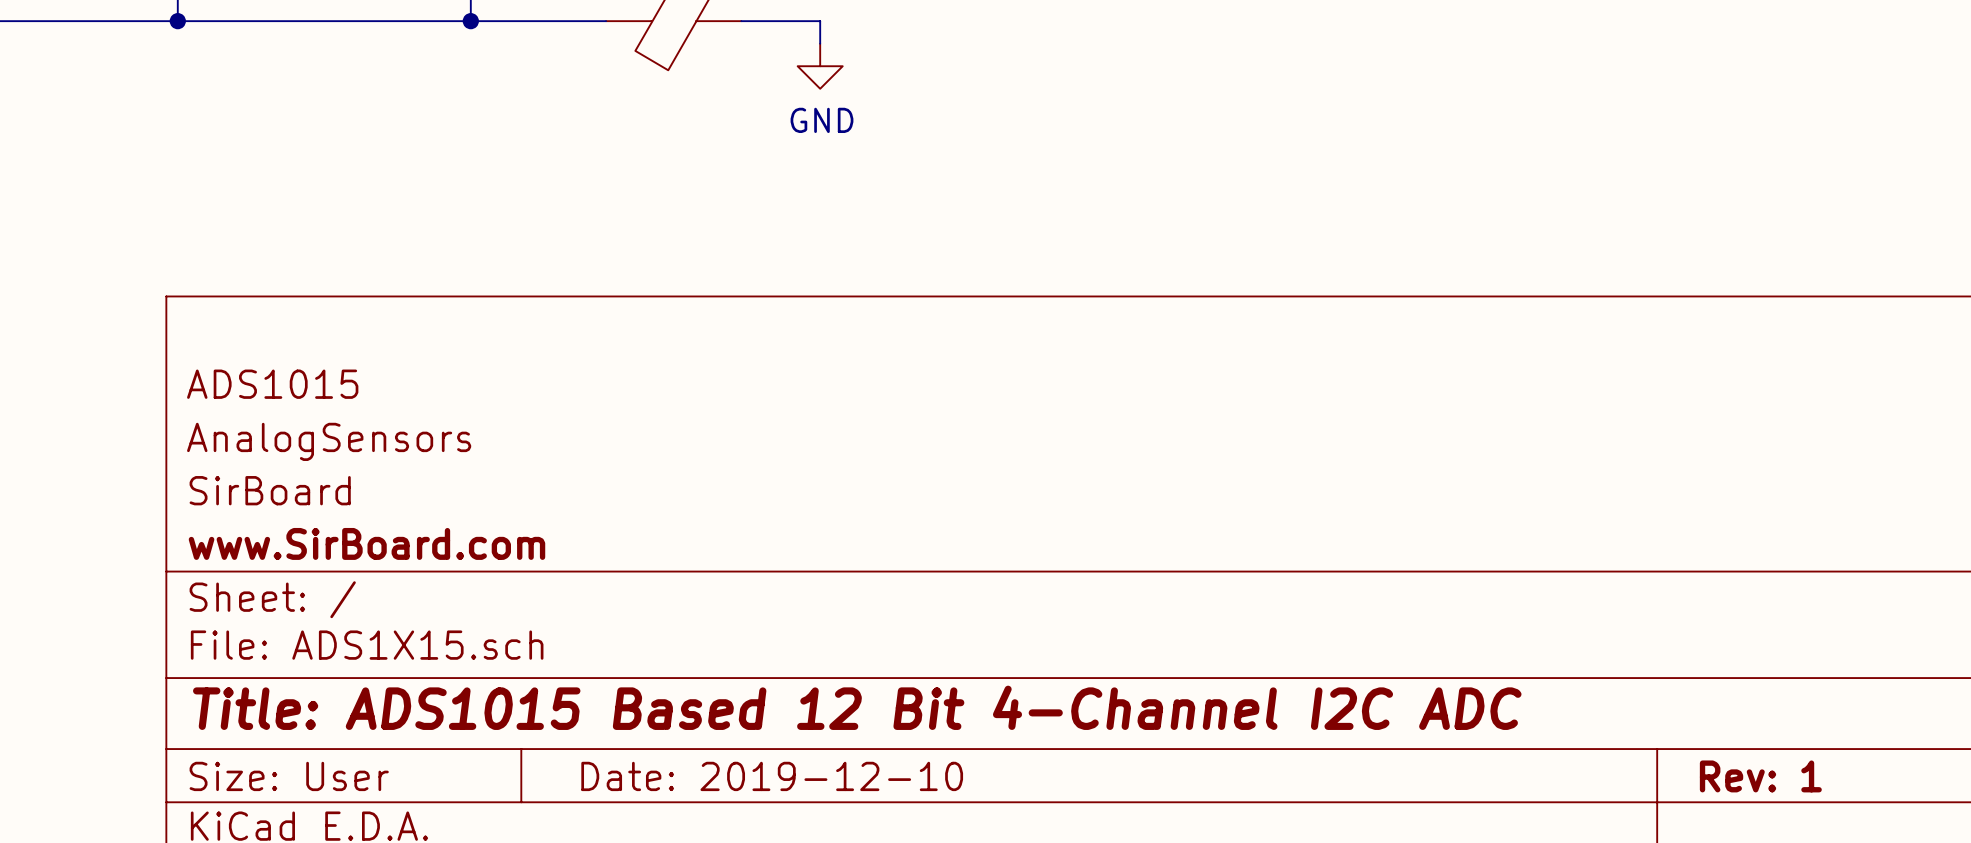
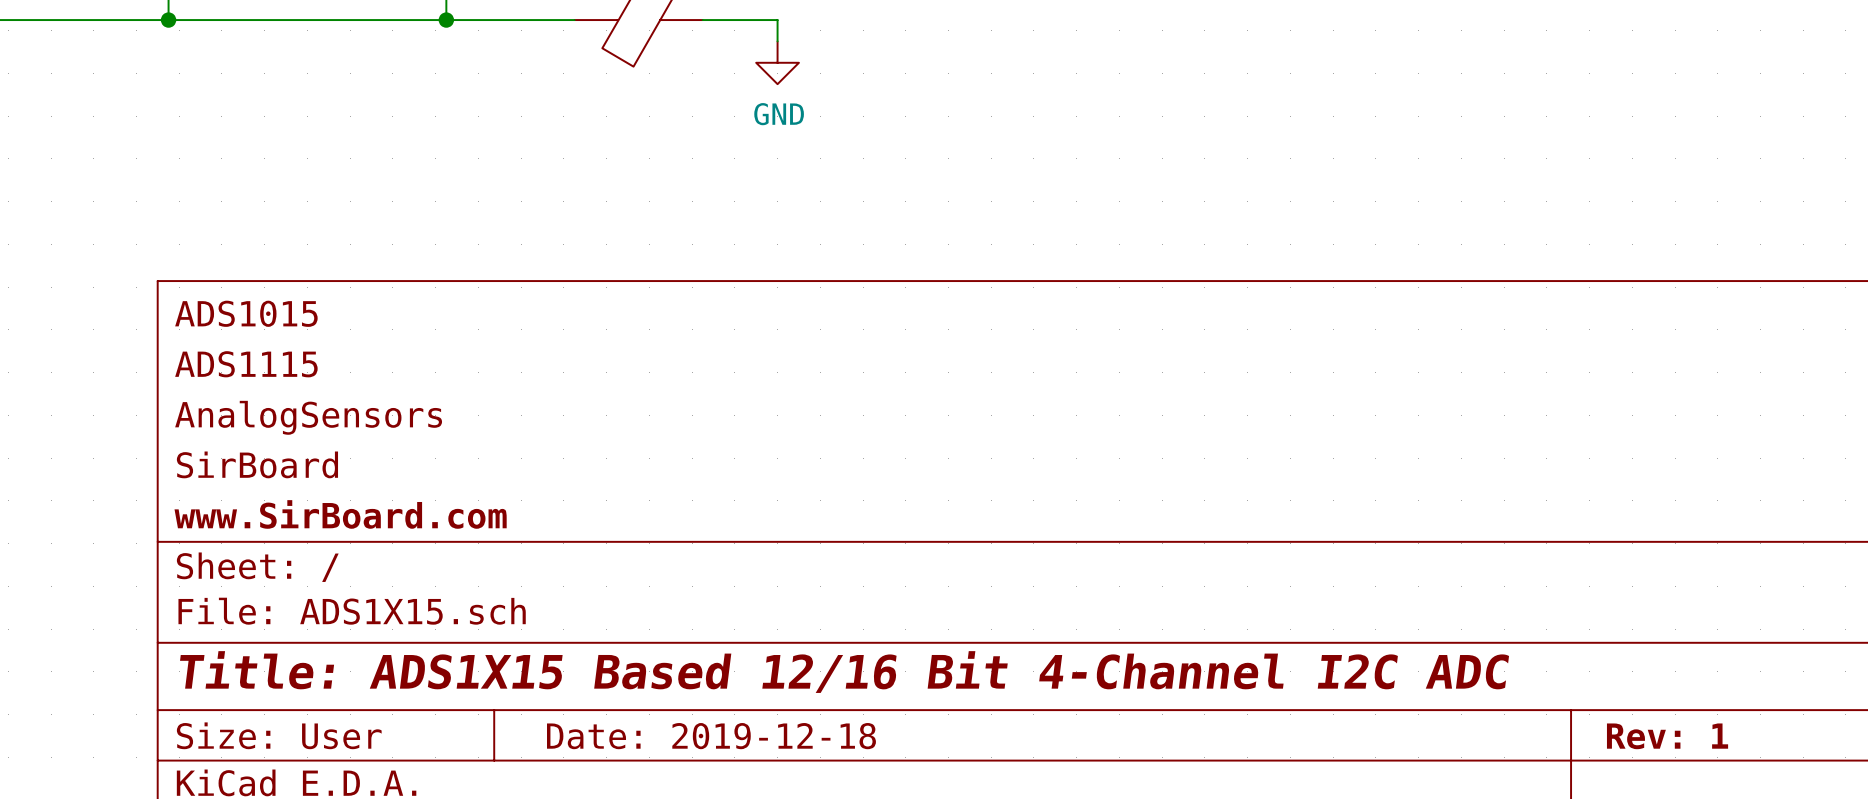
title block: none -> ADS1015 (246, 313)
title block: ADS1015 (272, 384) -> ADS1115 (246, 364)
title block: Title: ADS1015 Based 12 Bit 4-Channel I2C ADC (857, 707) -> Title: ADS1X15 Based 12/16 Bit 4-Channel I2C ADC (844, 672)
title block: Date: 2019-12-10 (772, 776) -> Date: 2019-12-18 (711, 736)

